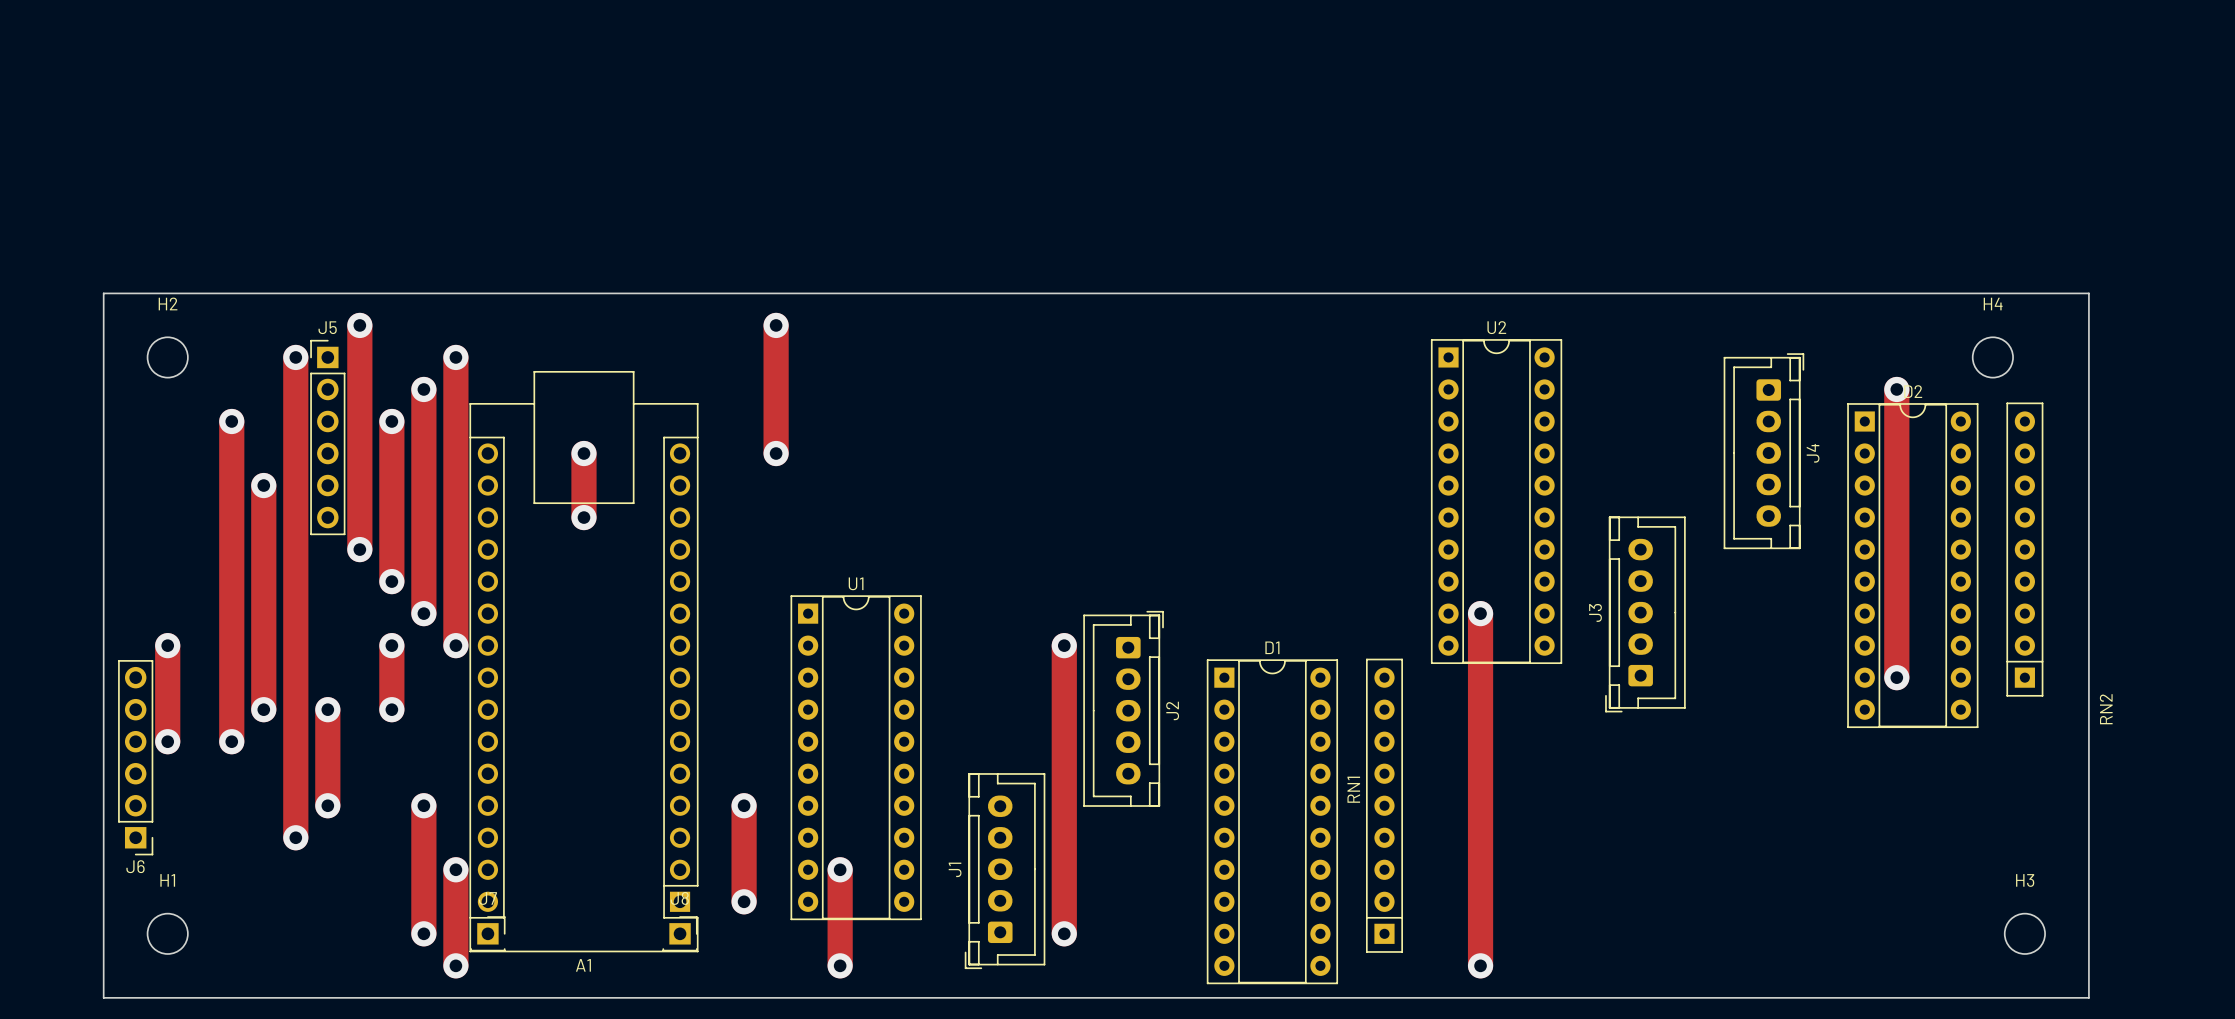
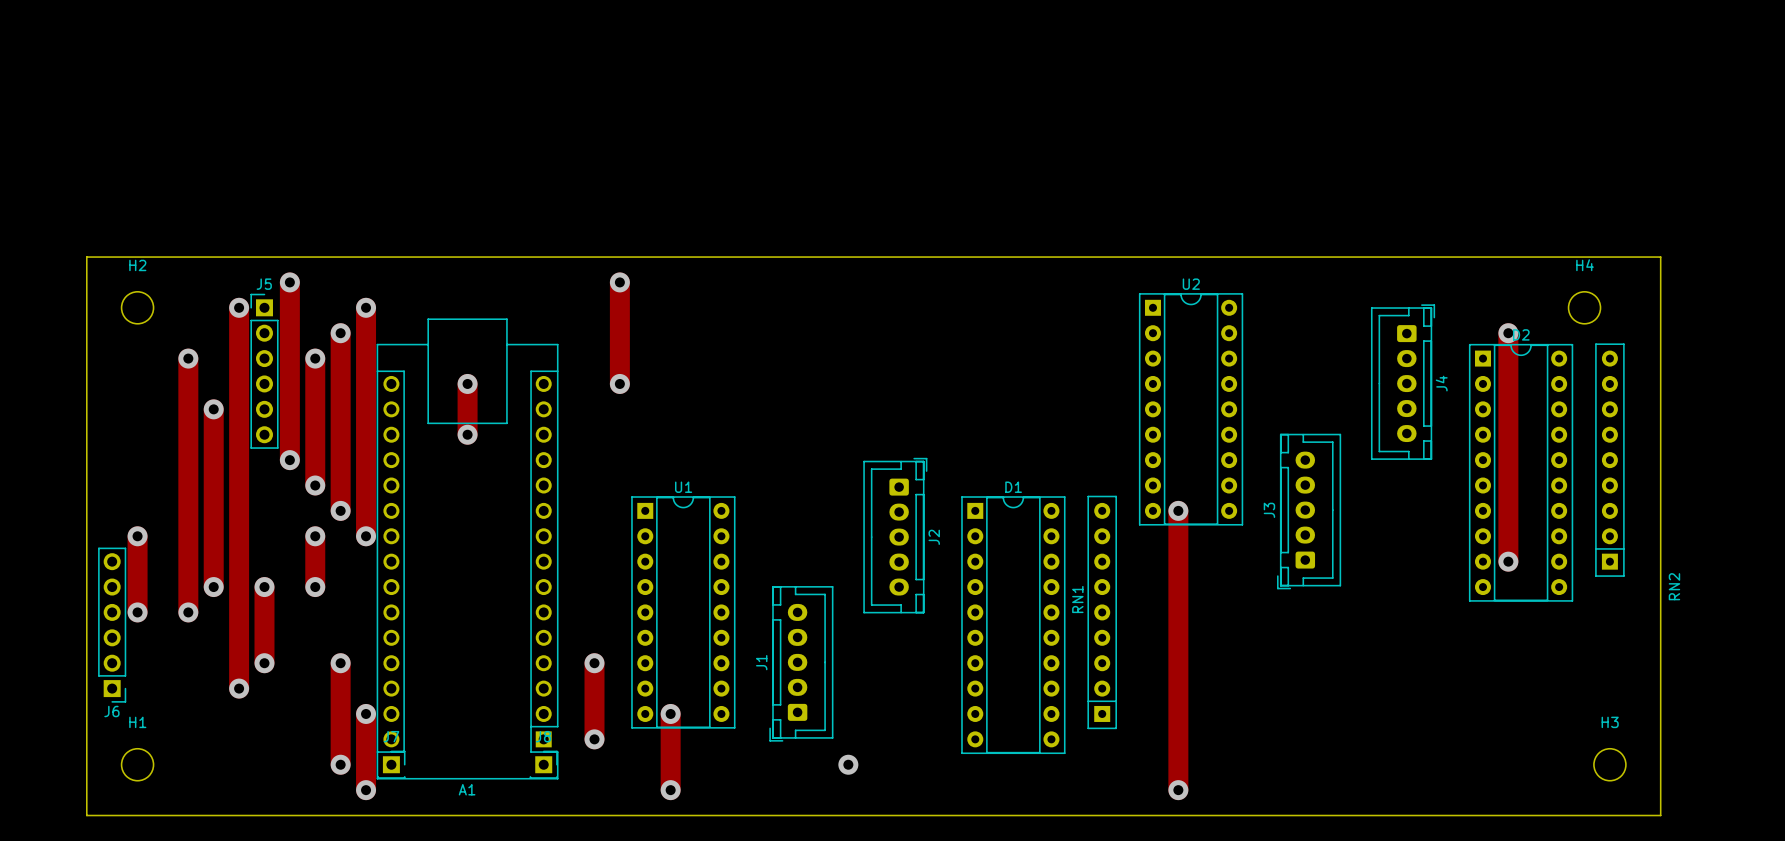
U2 footprint: [1431, 339, 1563, 664] -> [1139, 293, 1244, 526]
U1 footprint: [790, 595, 922, 921] -> [631, 496, 736, 729]
track: (1064, 645) (1064, 933) -> none
via: (1064, 645) -> none
J2 position: (1123, 708) -> (895, 535)
RN1 position: (1384, 805) -> (1102, 612)
D1 position: (1272, 821) -> (1013, 625)
J1 position: (1005, 871) -> (801, 663)

